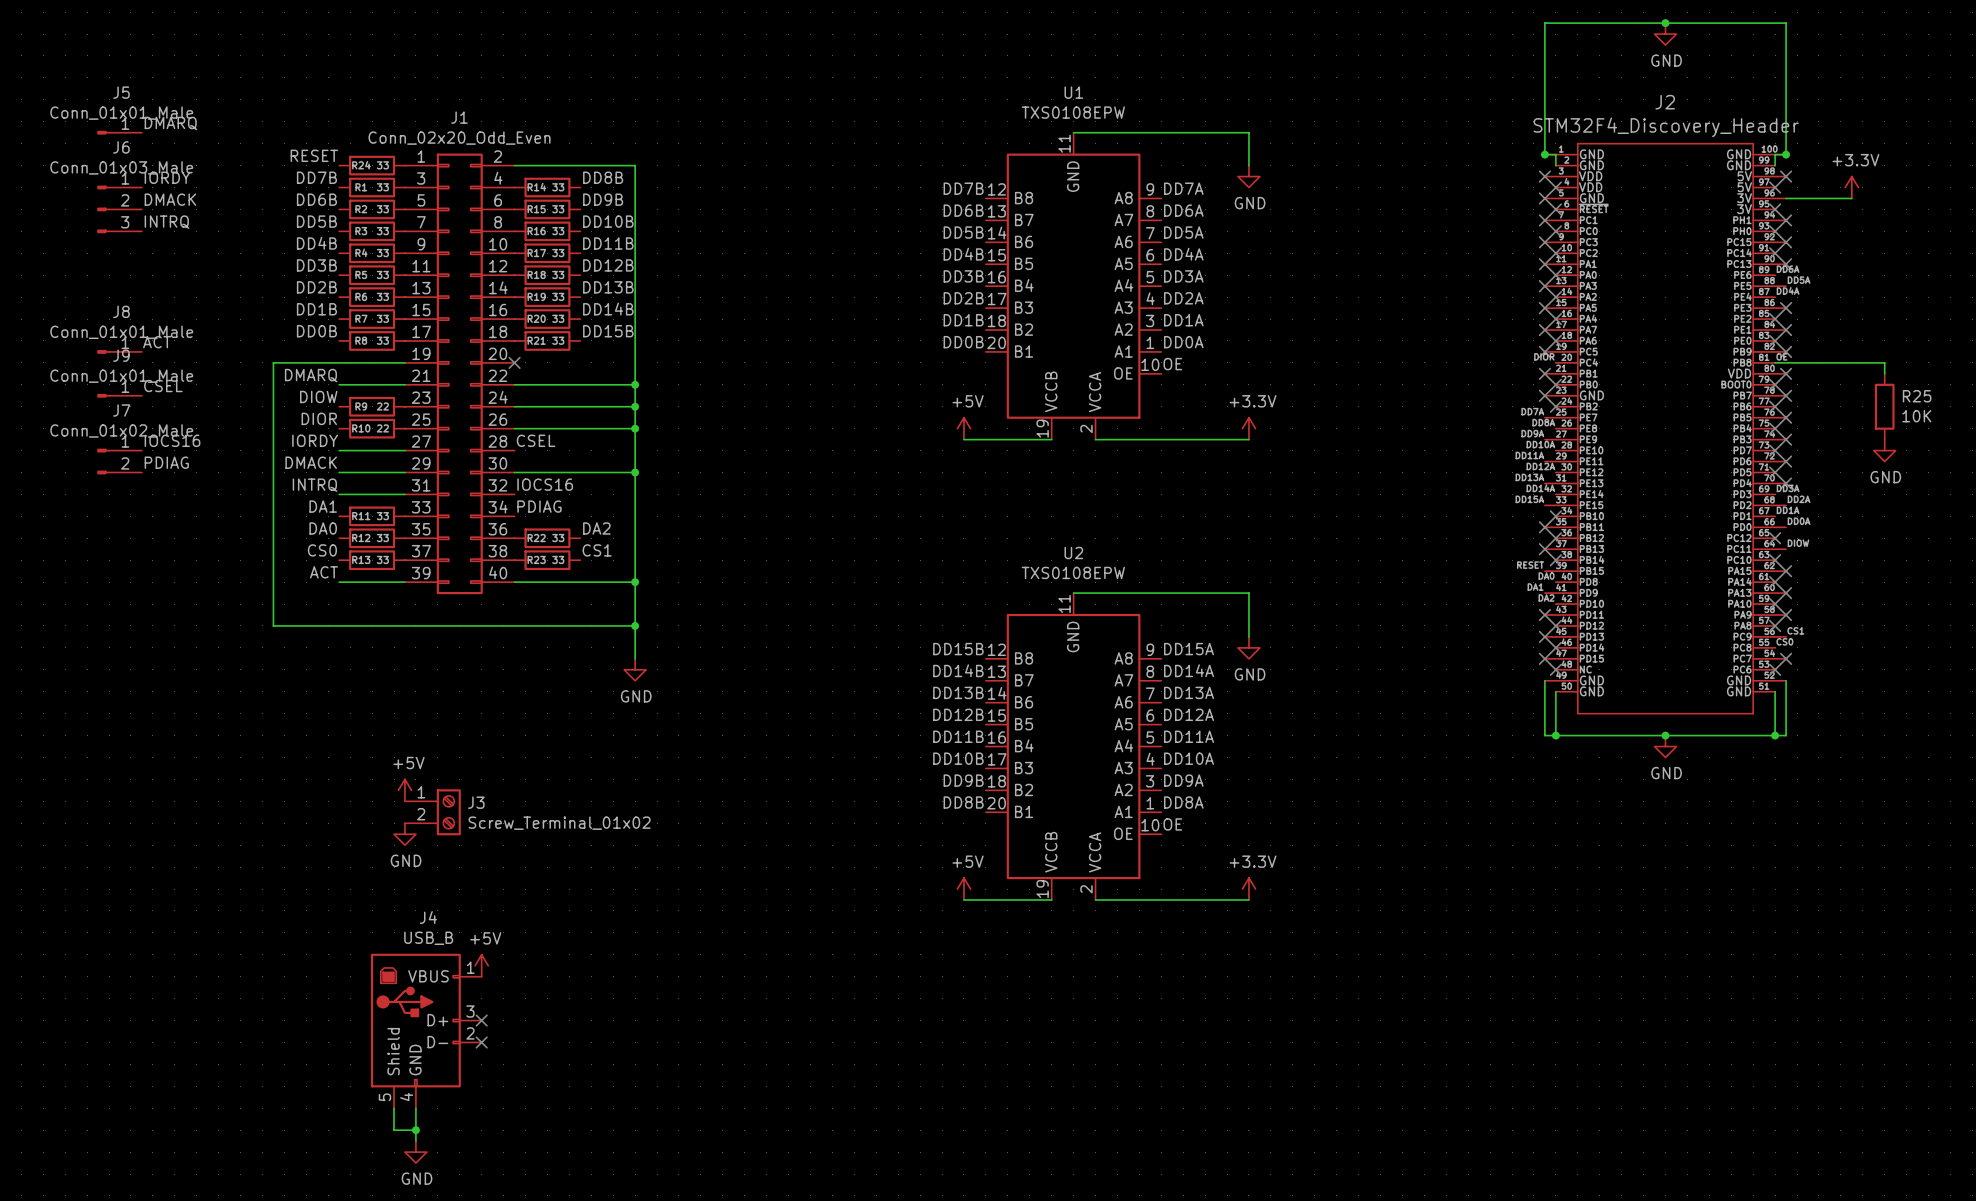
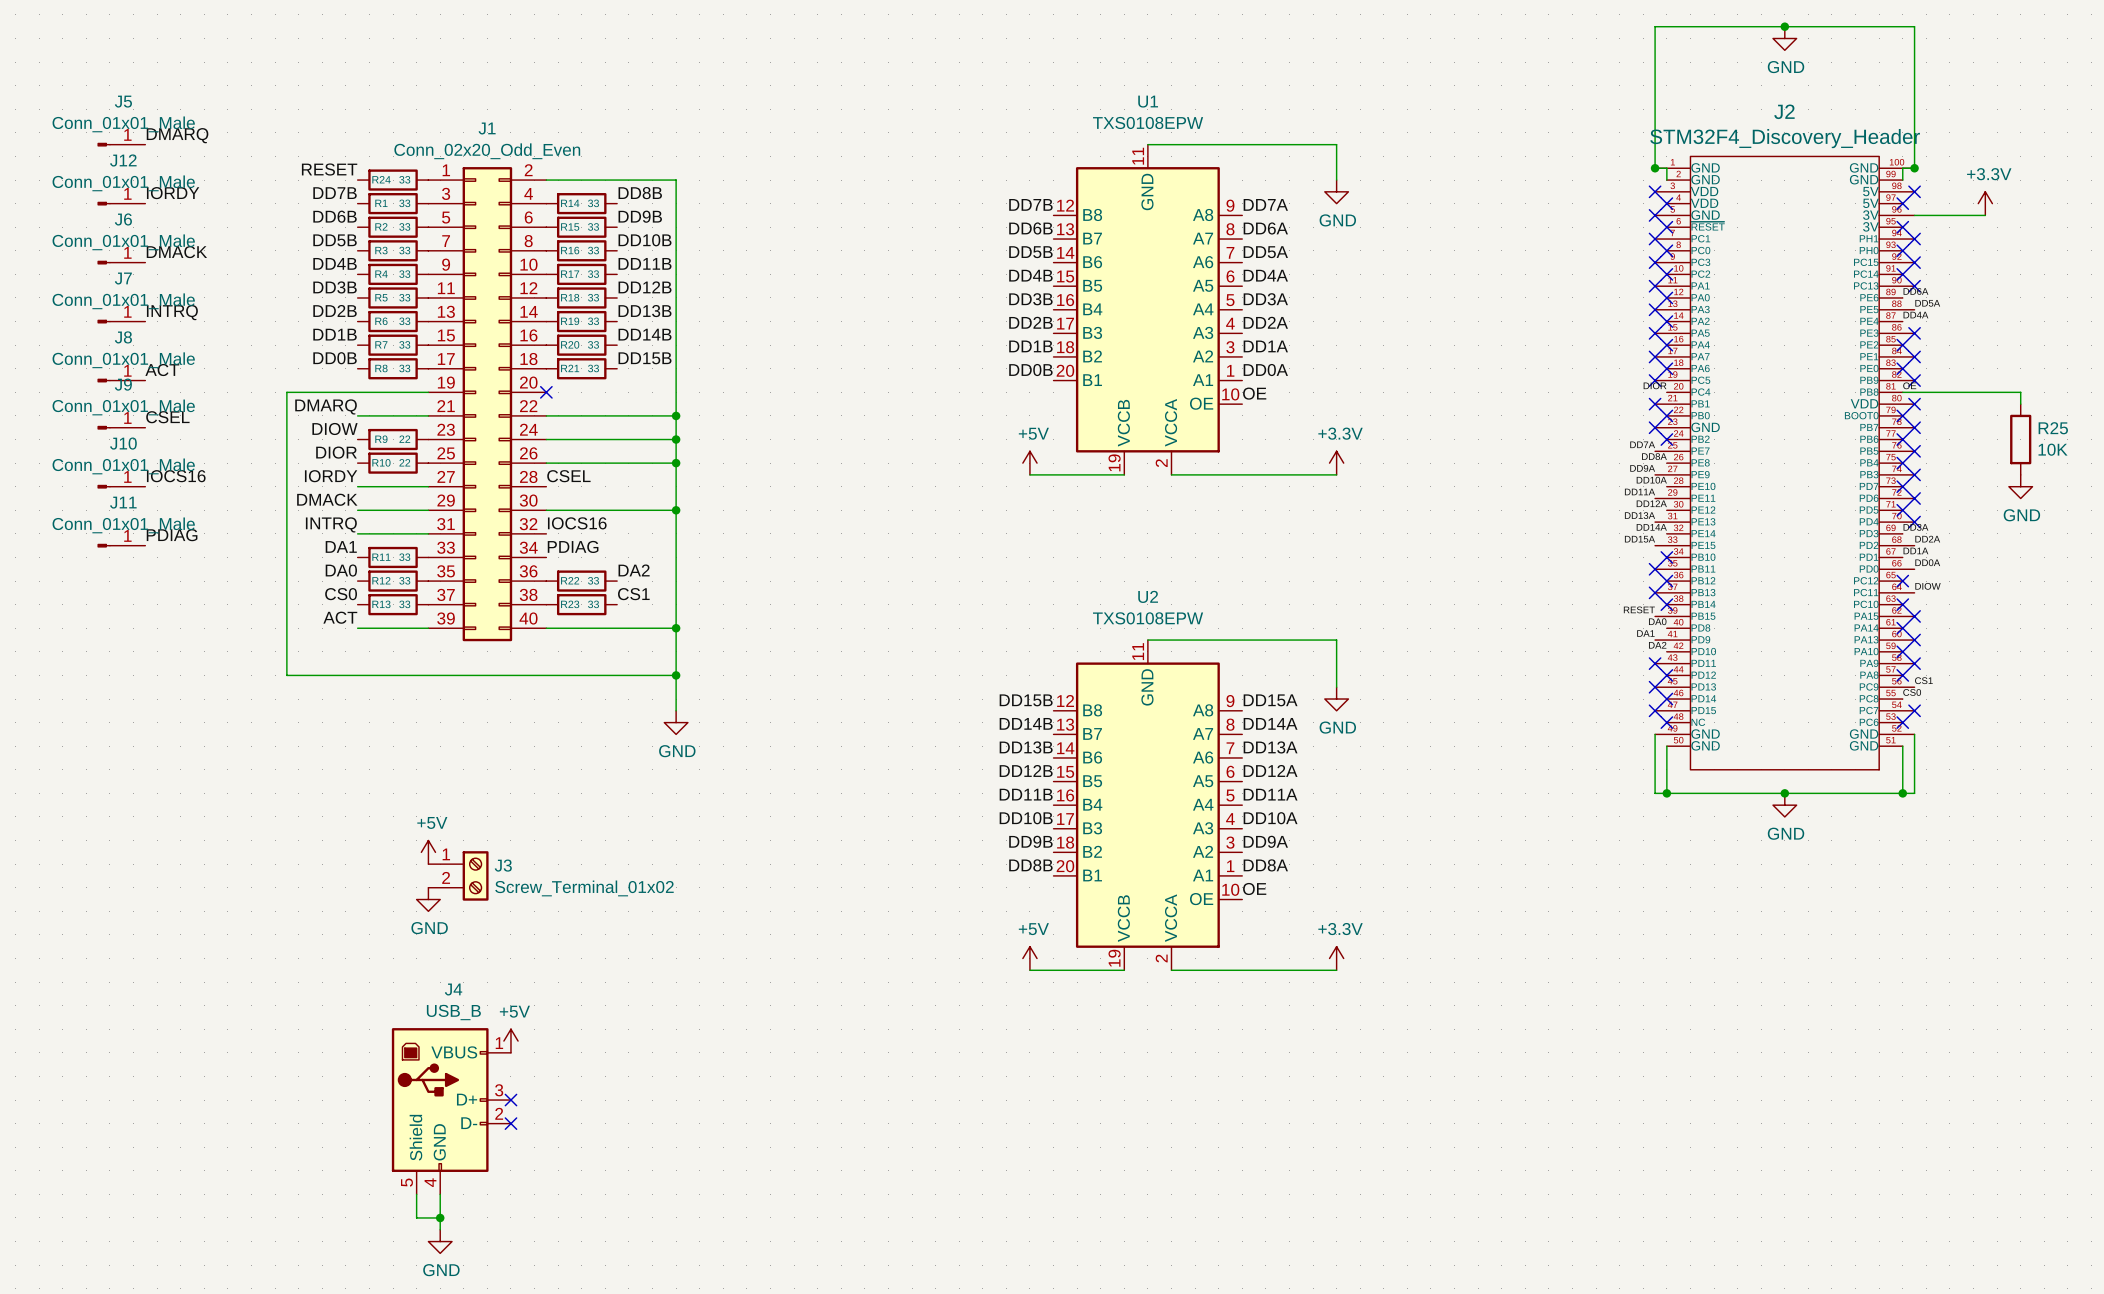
J6 name position: J6 (121, 147) -> J6 (123, 219)
J6 value: Conn_01x03_Male (121, 167) -> Conn_01x01_Male (123, 242)
J6 symbol: [97, 185, 142, 234] -> [97, 260, 146, 265]
J12: none -> Conn_01x01_Male (121, 203)
label position: DMACK (170, 199) -> DMACK (176, 252)
label position: INTRQ (167, 222) -> INTRQ (172, 312)
J7 value: Conn_01x02_Male (121, 430) -> Conn_01x01_Male (123, 301)
J7 symbol: [97, 448, 142, 475] -> [97, 319, 146, 324]
J10: none -> Conn_01x01_Male (121, 486)
label position: PDIAG (166, 462) -> PDIAG (172, 535)
J11: none -> Conn_01x01_Male (121, 545)

